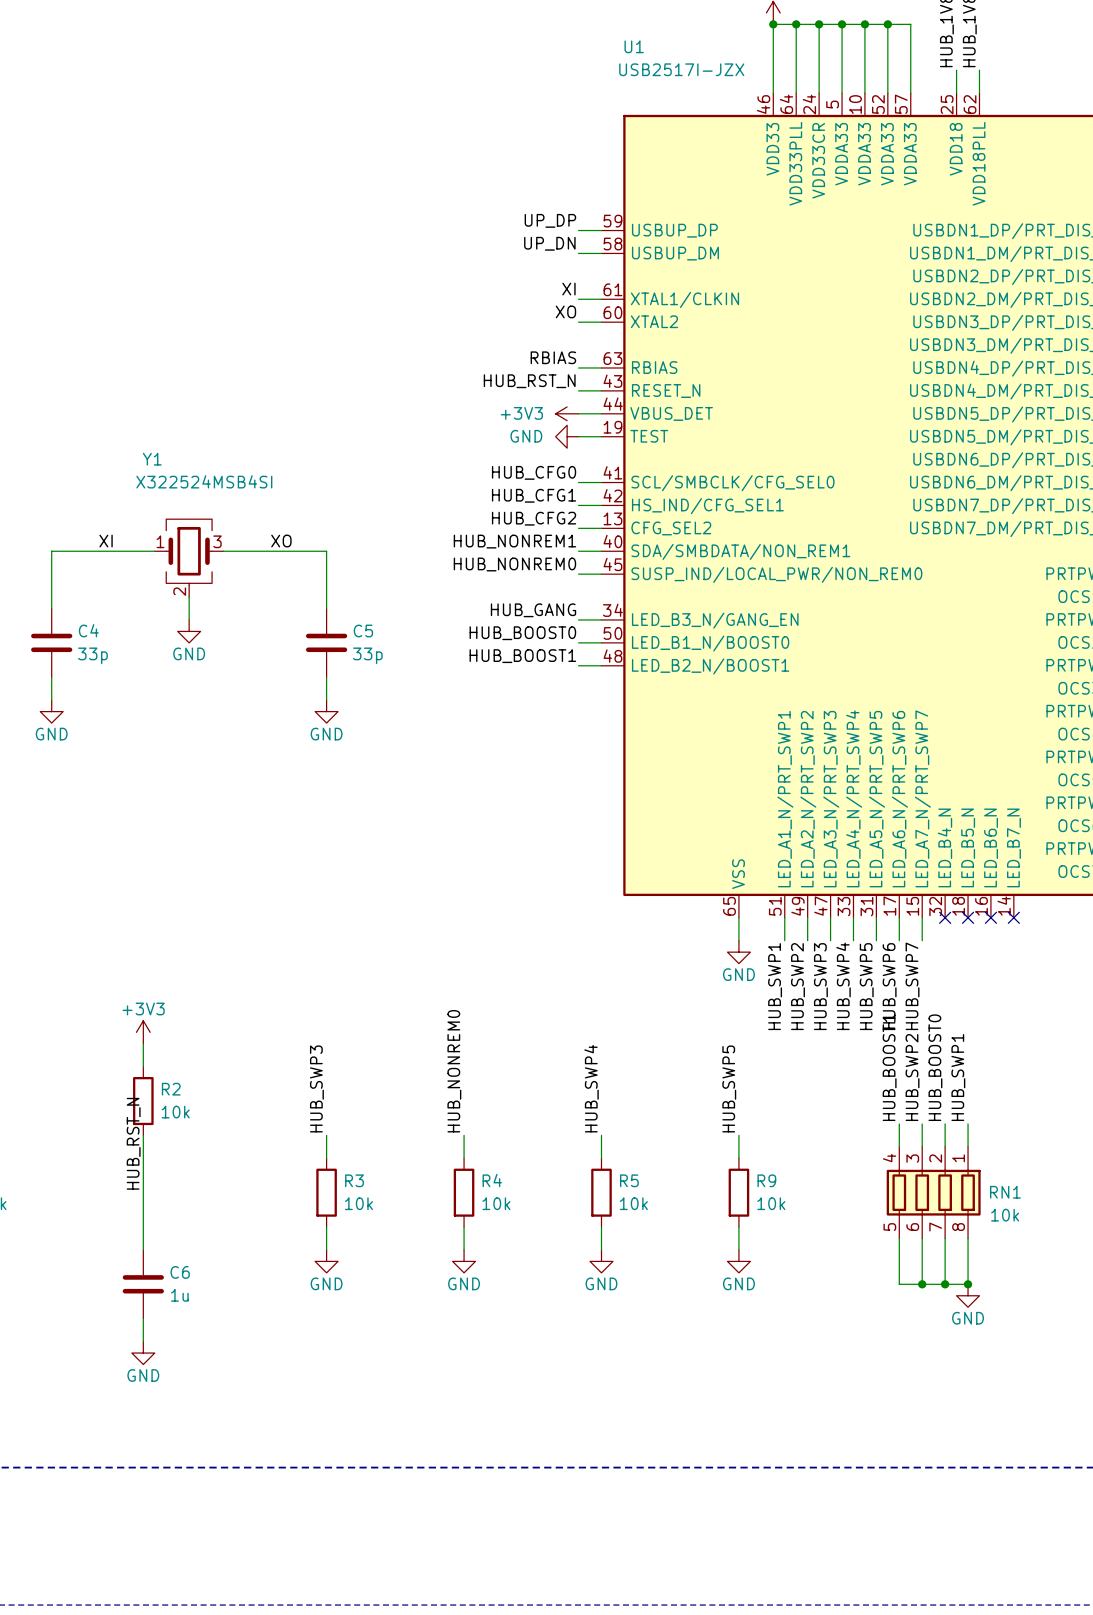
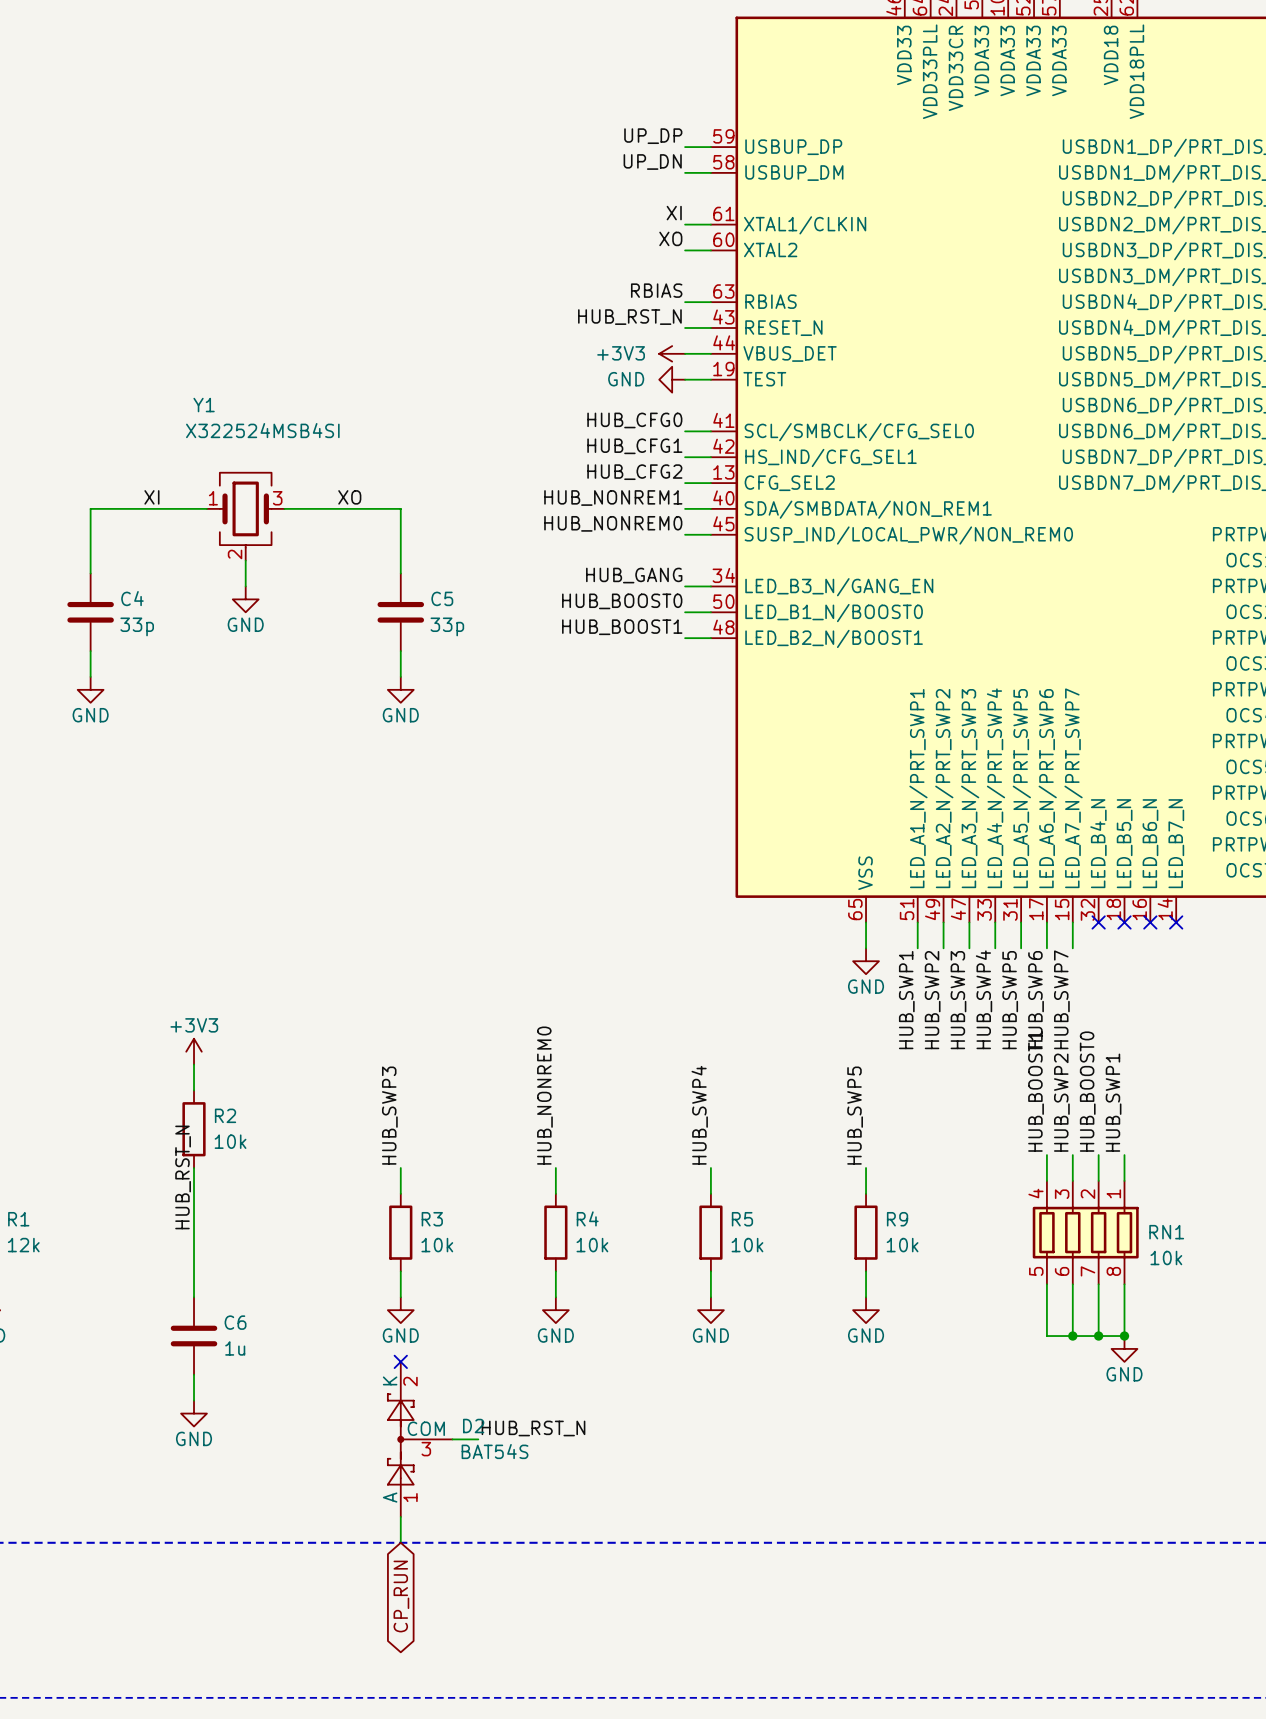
no-connect mark: none -> (400, 1361)
label: none -> HUB_RST_N (533, 1428)
D2: none -> BAT54S (420, 1439)
wire: none -> (452, 1439) (478, 1439)
wire: none -> (400, 1516) (400, 1542)
global label: none -> CP_RUN (401, 1596)

